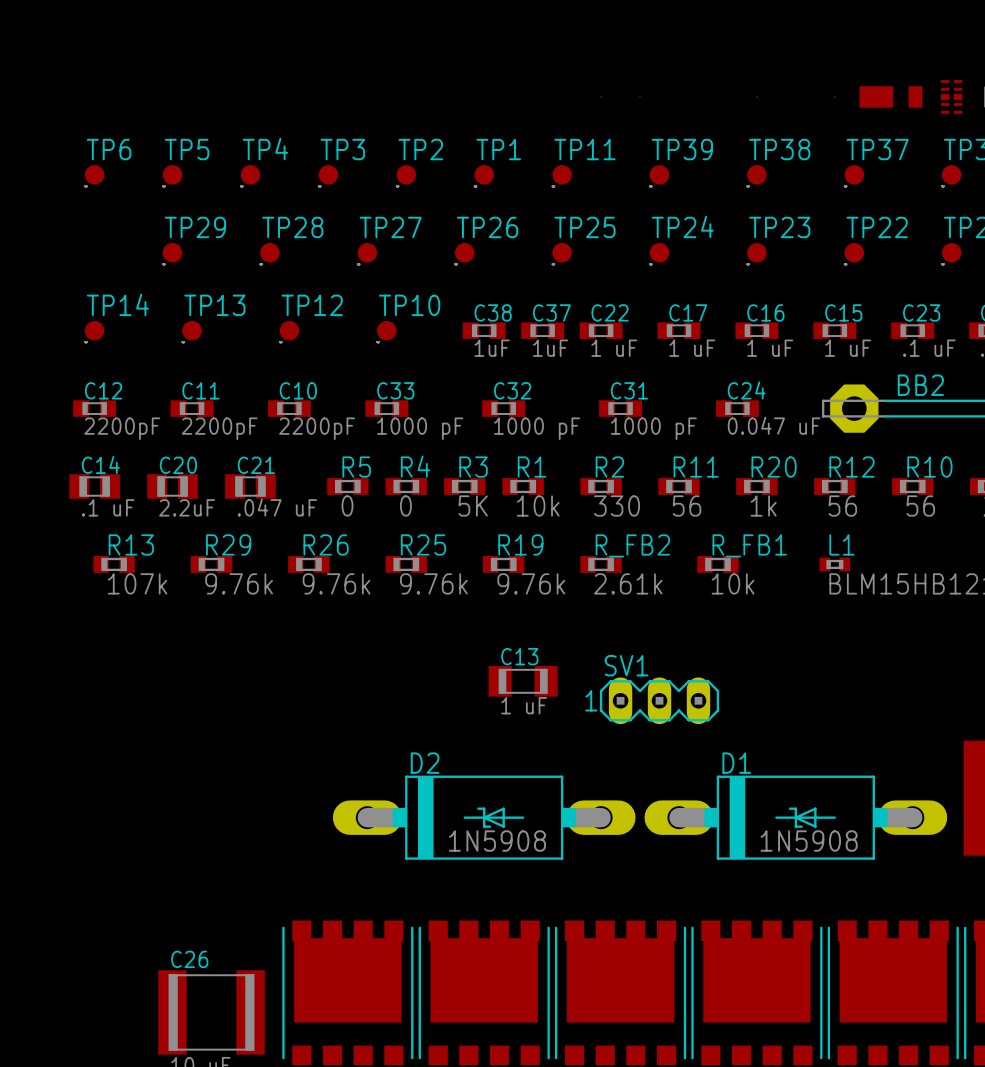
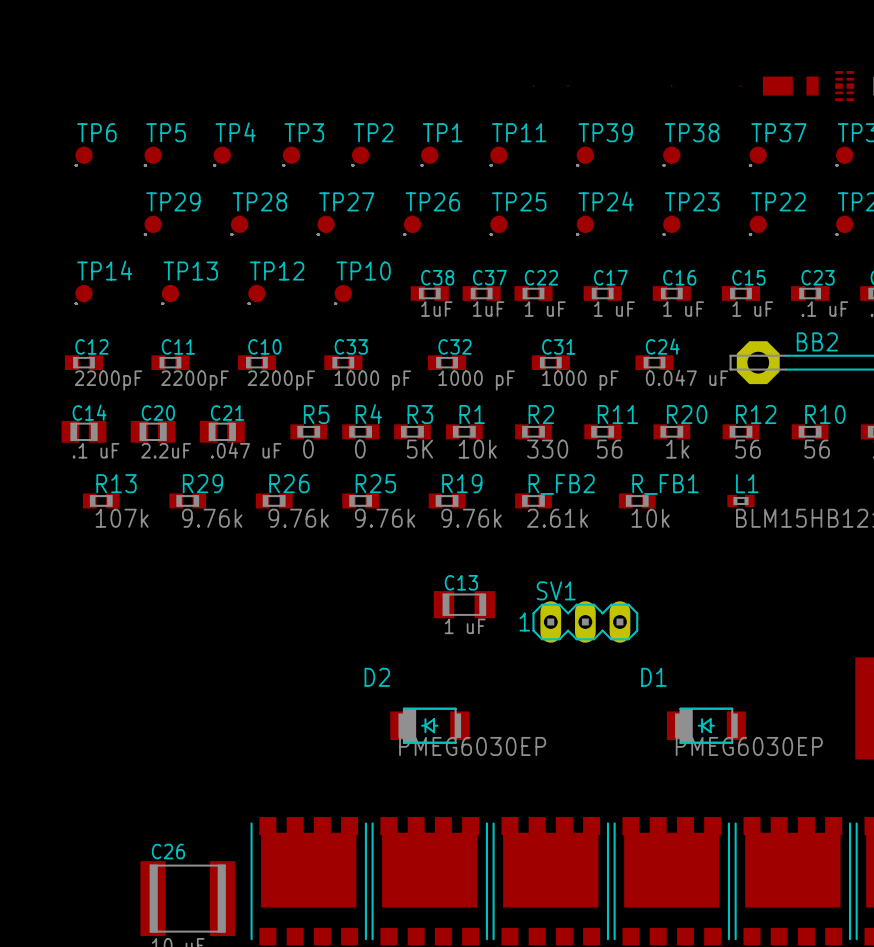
D2 footprint: [332, 775, 636, 860] -> [390, 707, 470, 744]
D1 footprint: [644, 775, 948, 860] -> [666, 707, 746, 744]
D2 value: 1N5908 (497, 841) -> PMEG6030EP (472, 746)
D1 value: 1N5908 (809, 841) -> PMEG6030EP (749, 746)

